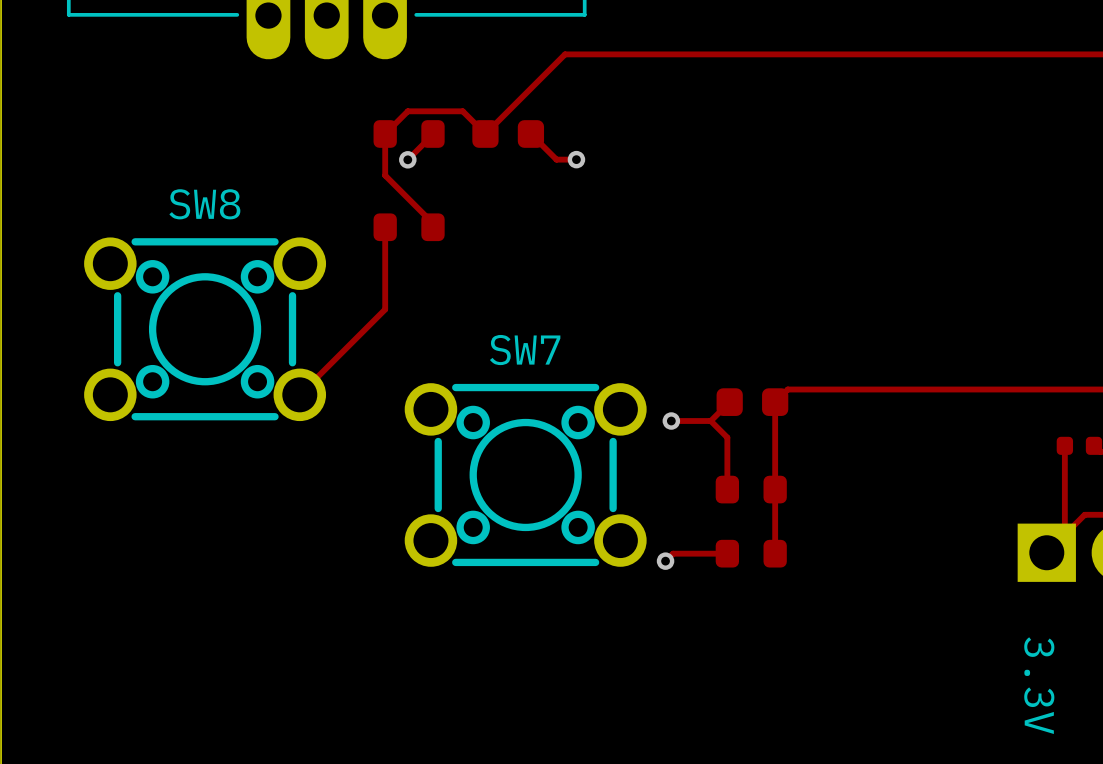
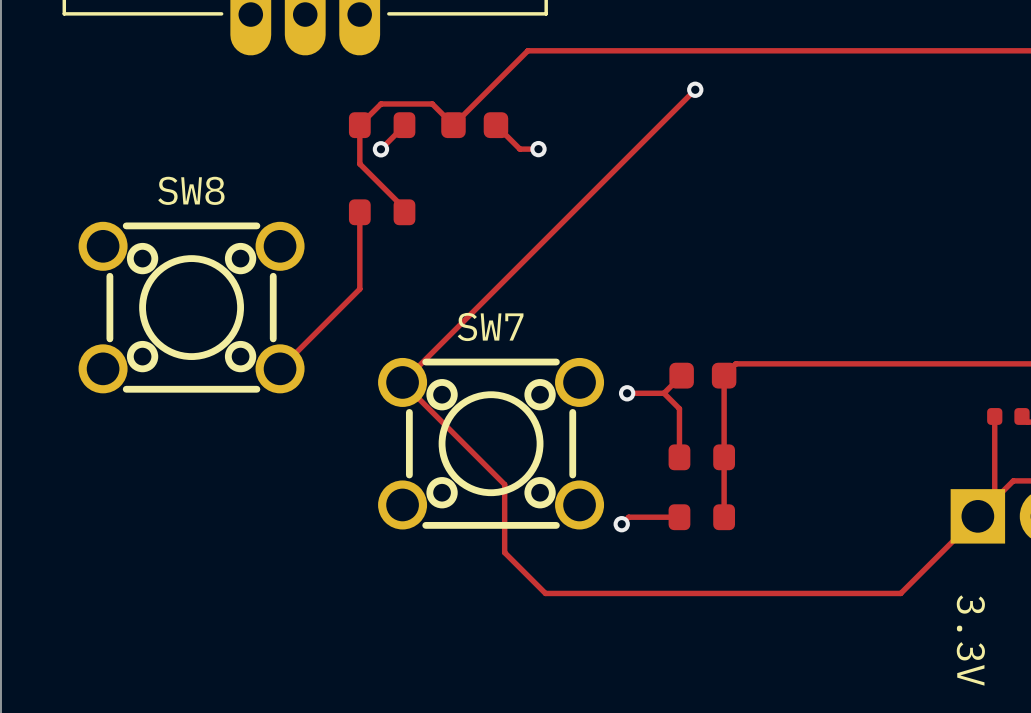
track: none -> (695, 89) (402, 382) (504, 484) (504, 552) (545, 593) (900, 593) (977, 516)
via: none -> (695, 89)

